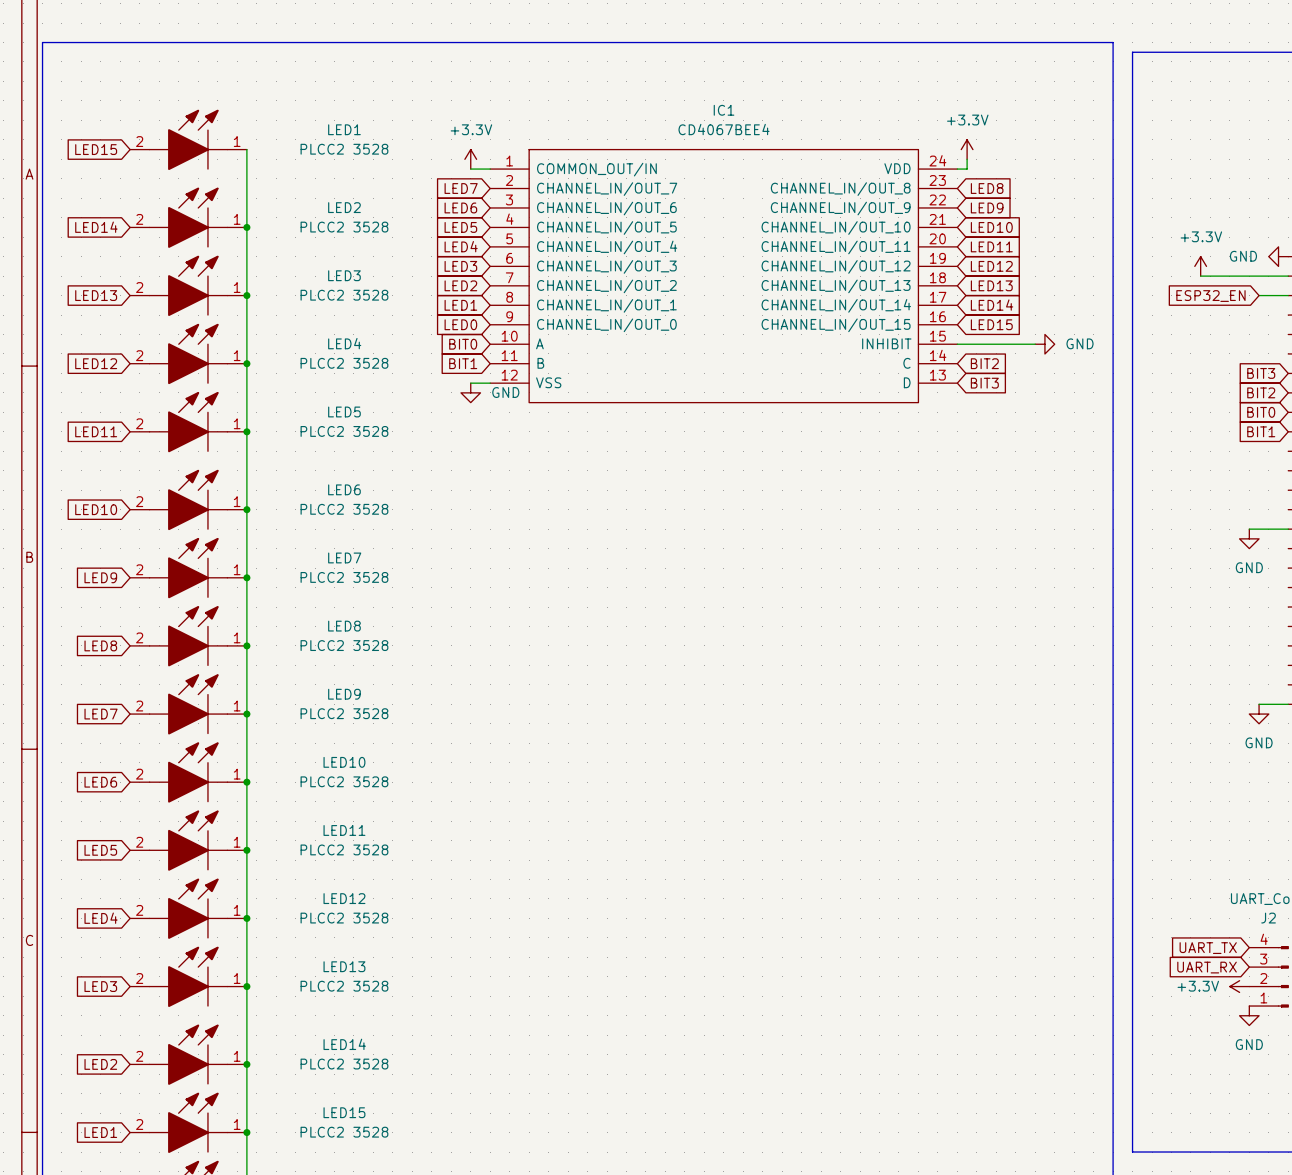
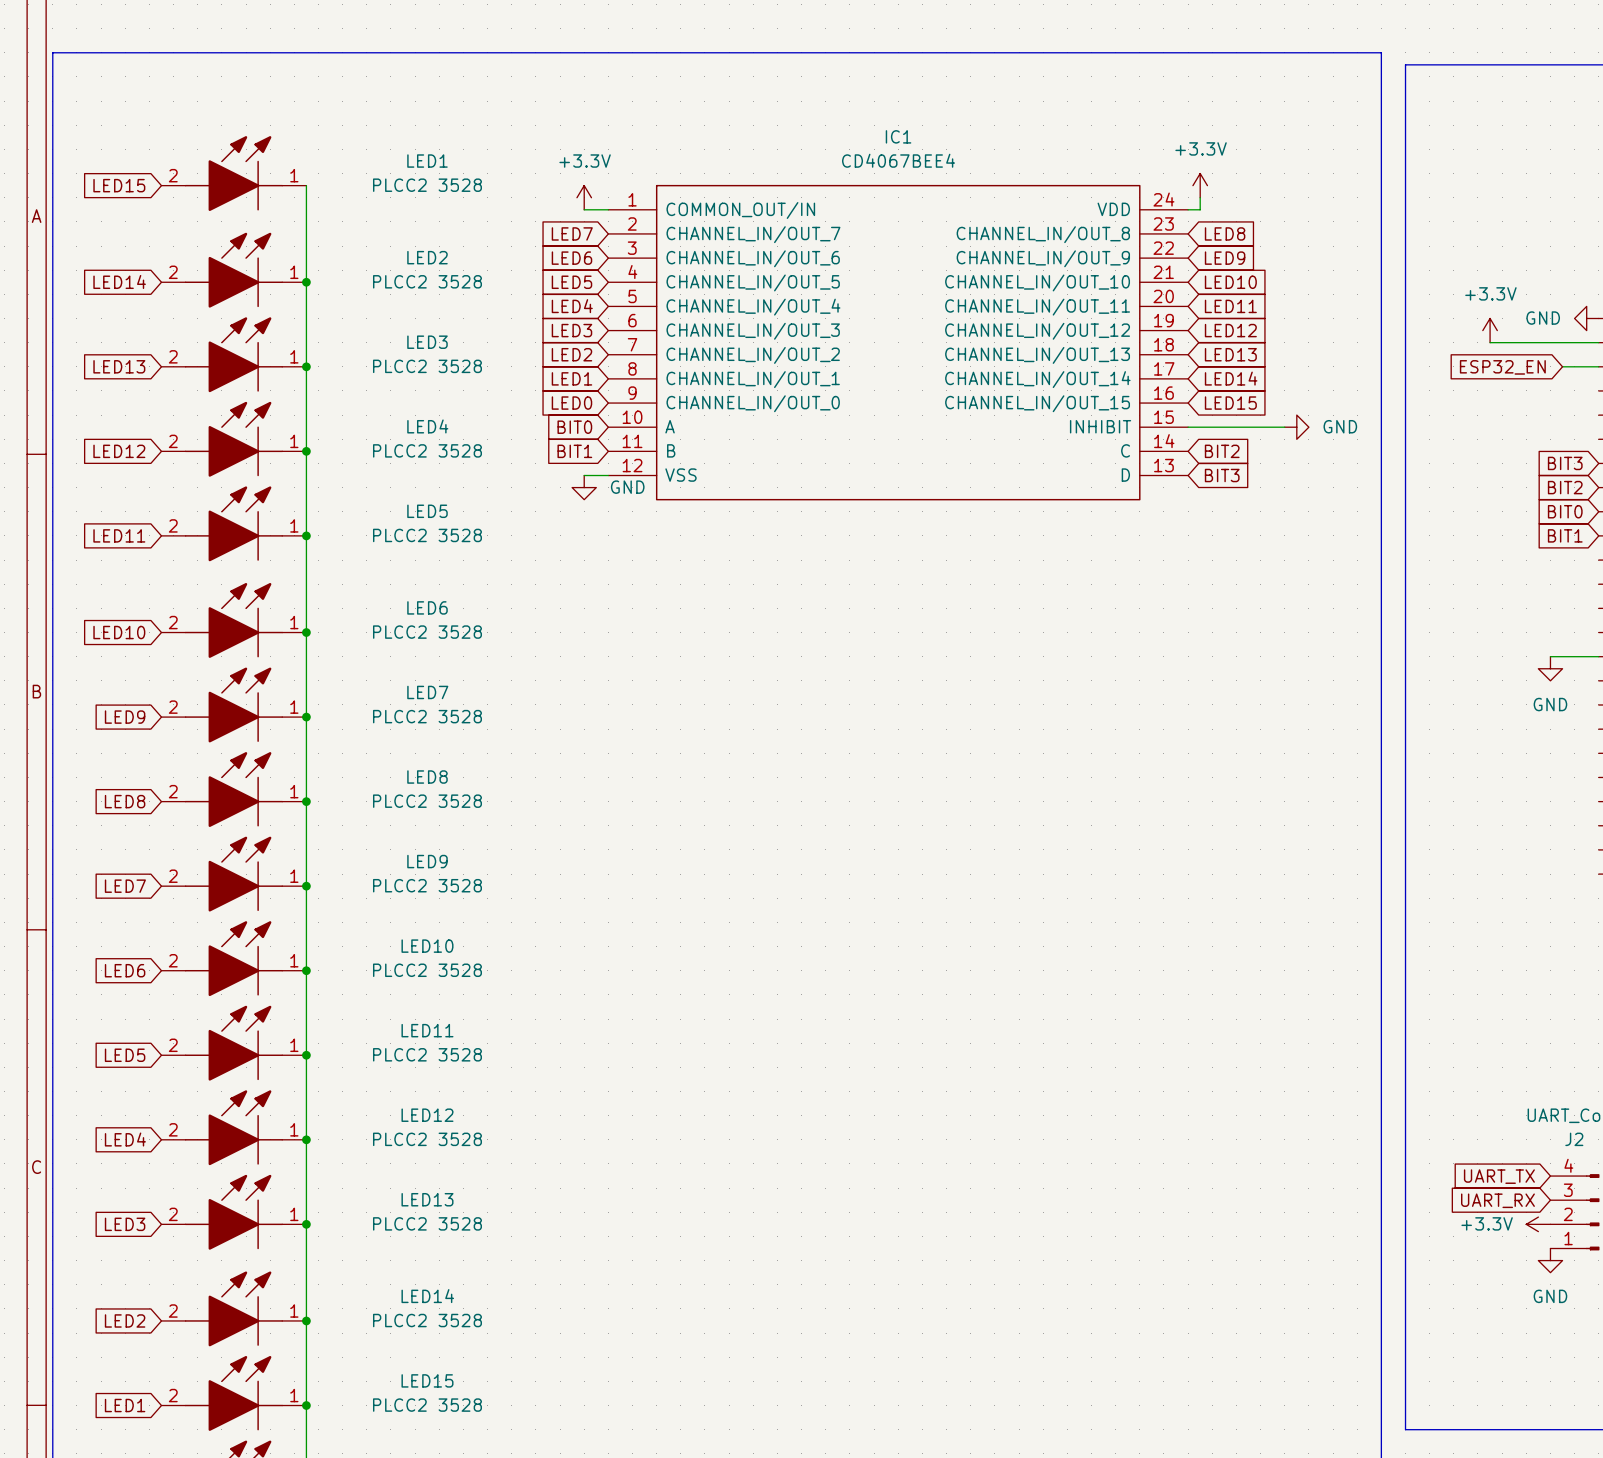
wire: (1259, 704) (1288, 704) -> none
power symbol: GND (1259, 714) -> none

